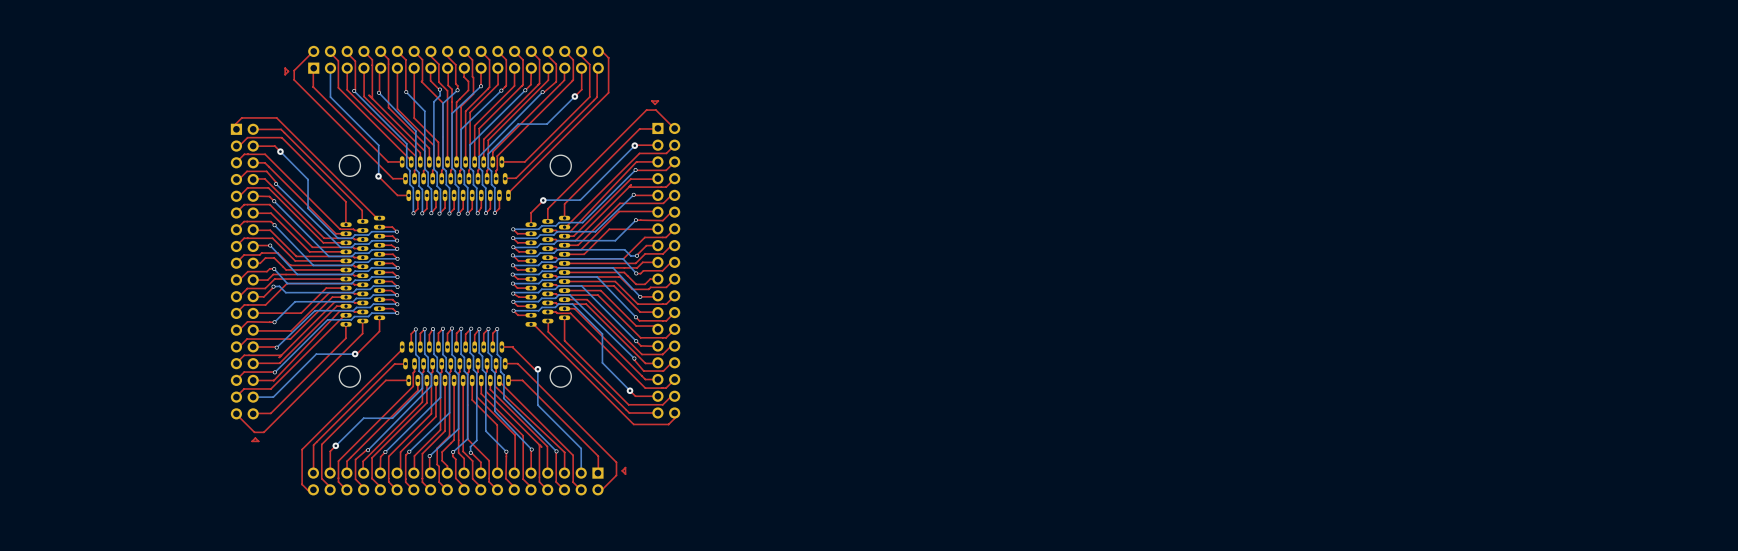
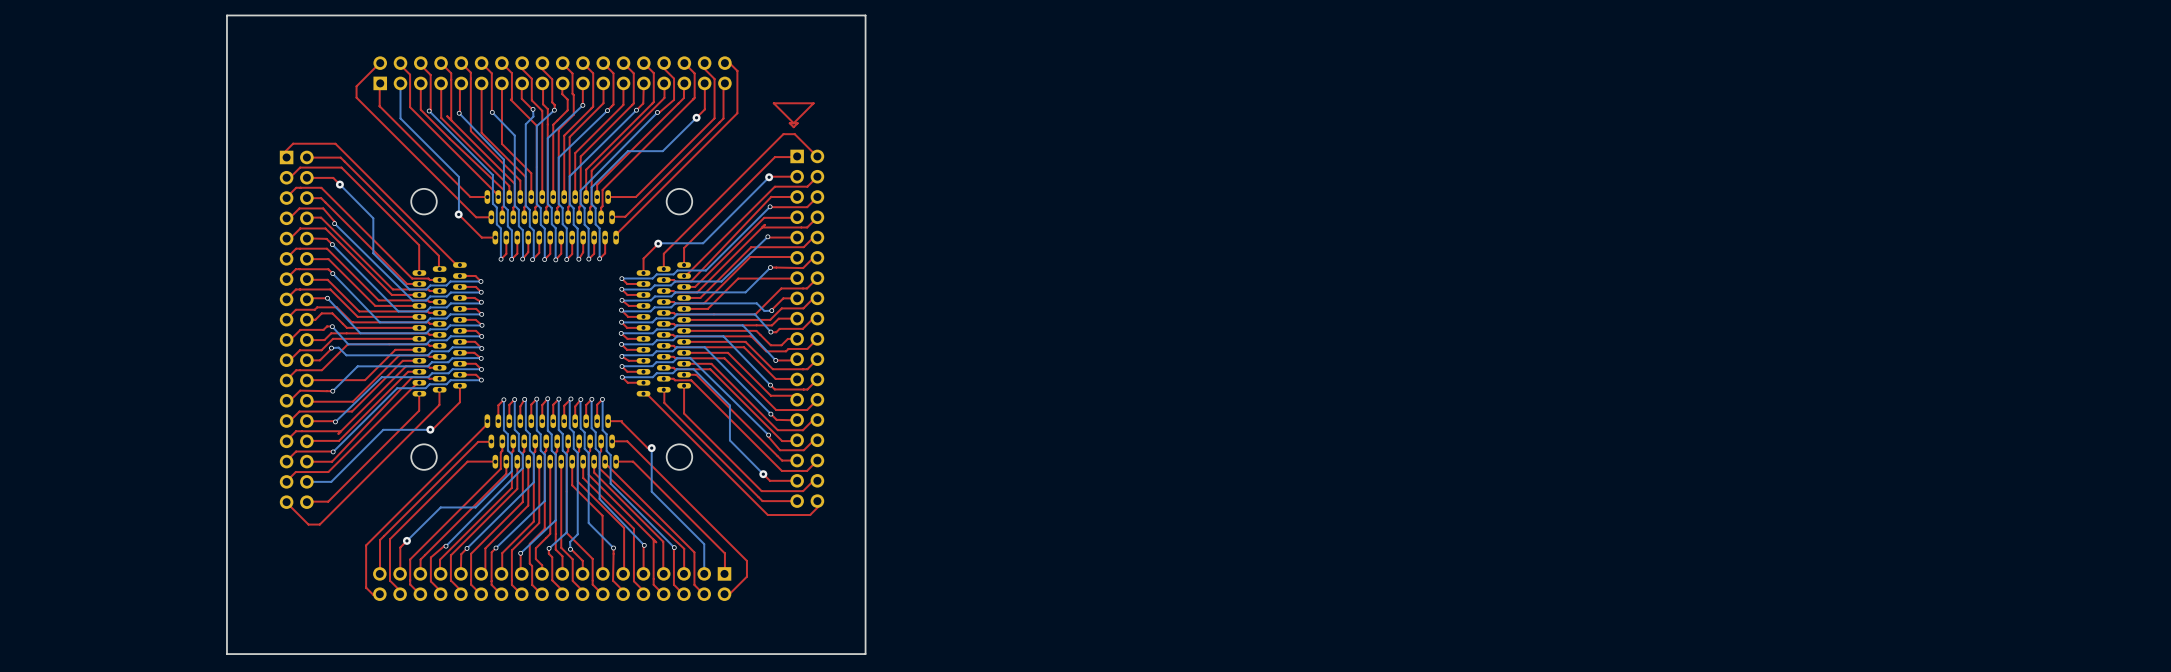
board edge: none -> (865, 15) (865, 654) (226, 654) (226, 15) (865, 15)
top track: (285, 68) (285, 74) (288, 71) (285, 68) -> none
top track: none -> (813, 103) (773, 103) (793, 123) (813, 103)
top track: (255, 438) (252, 441) (258, 441) (255, 438) -> none
top track: (625, 467) (625, 474) (622, 470) (625, 467) -> none

